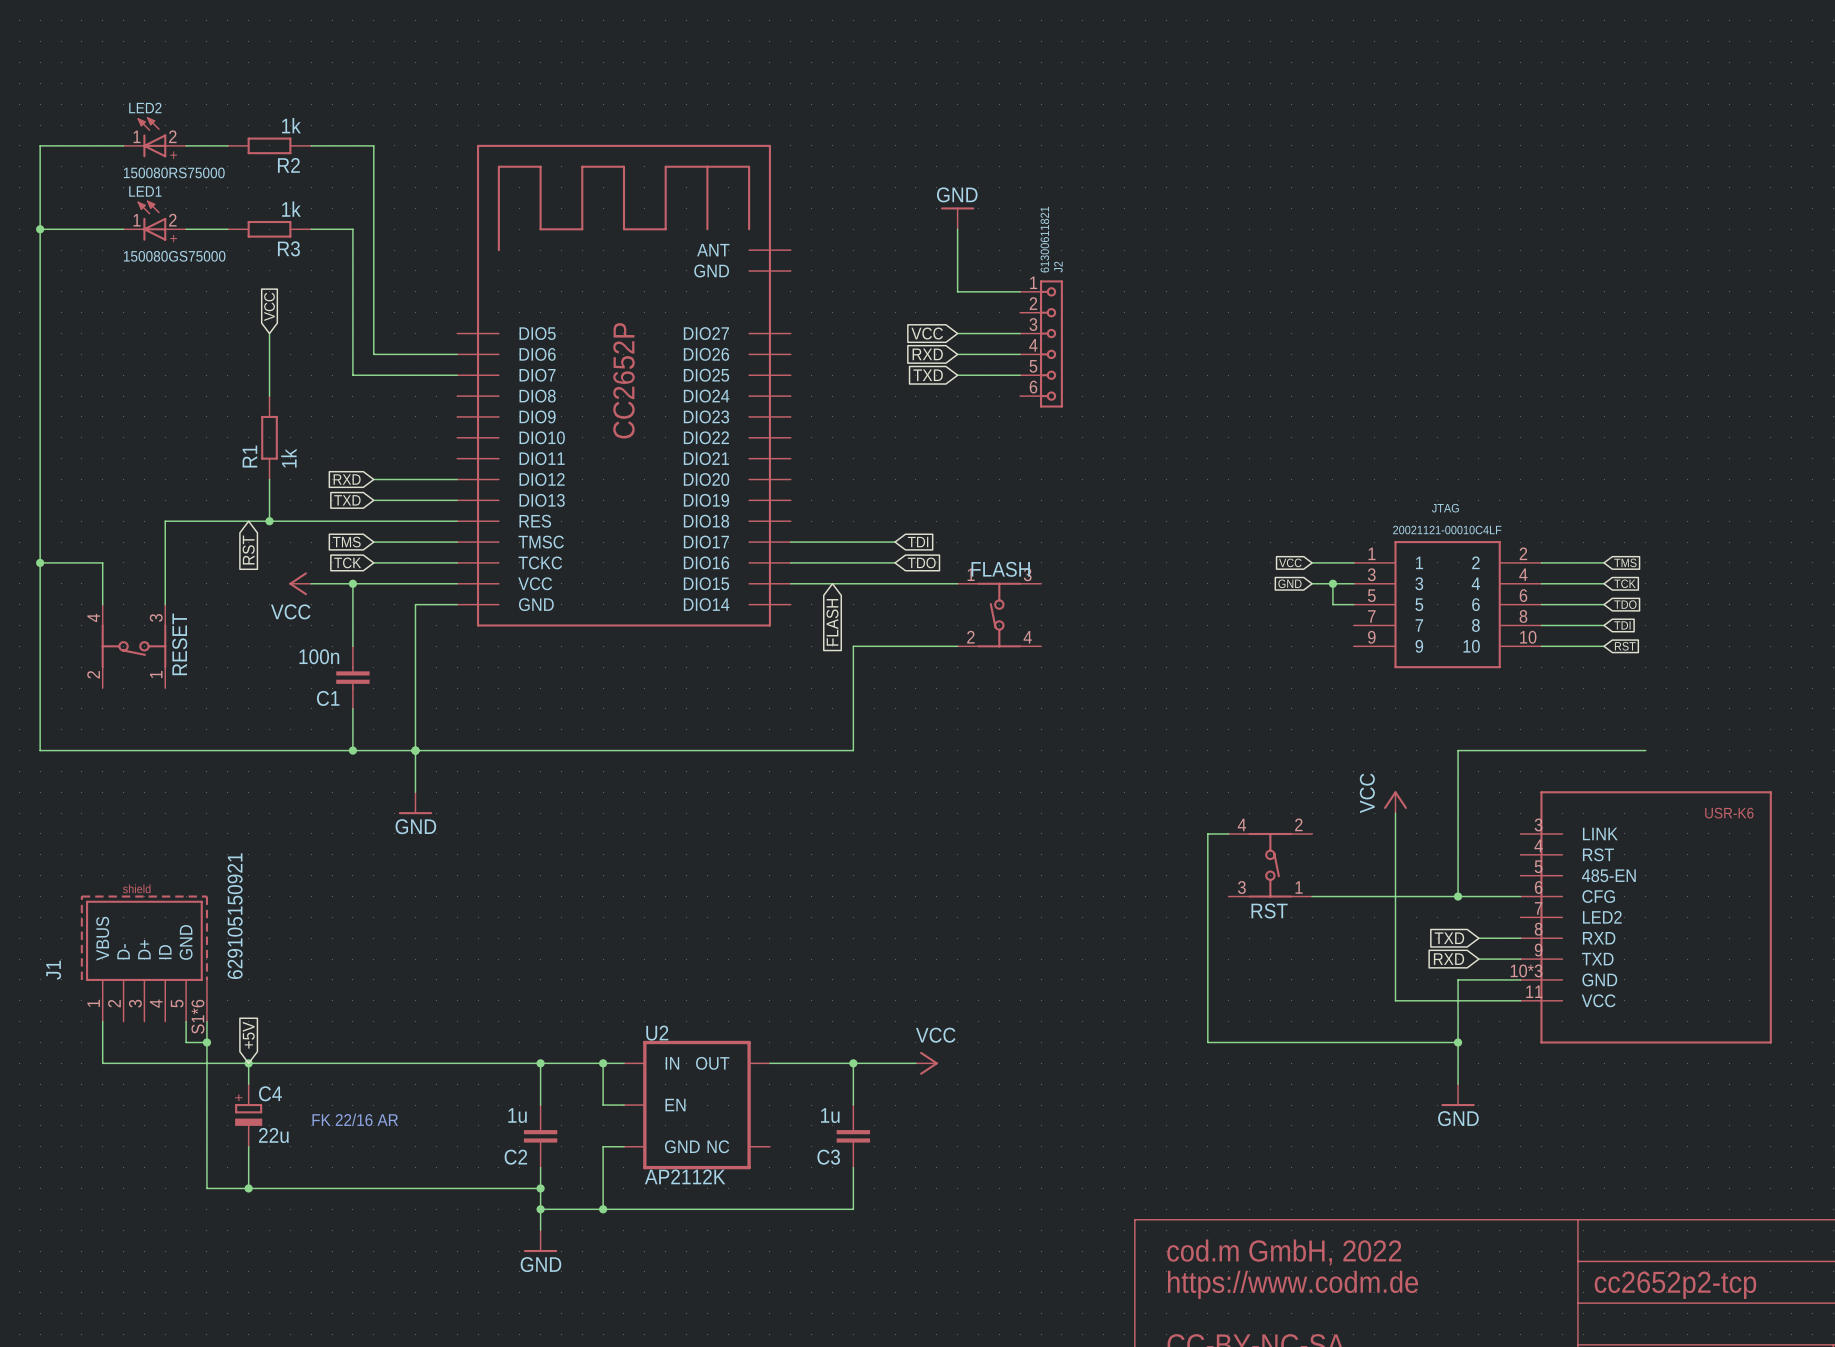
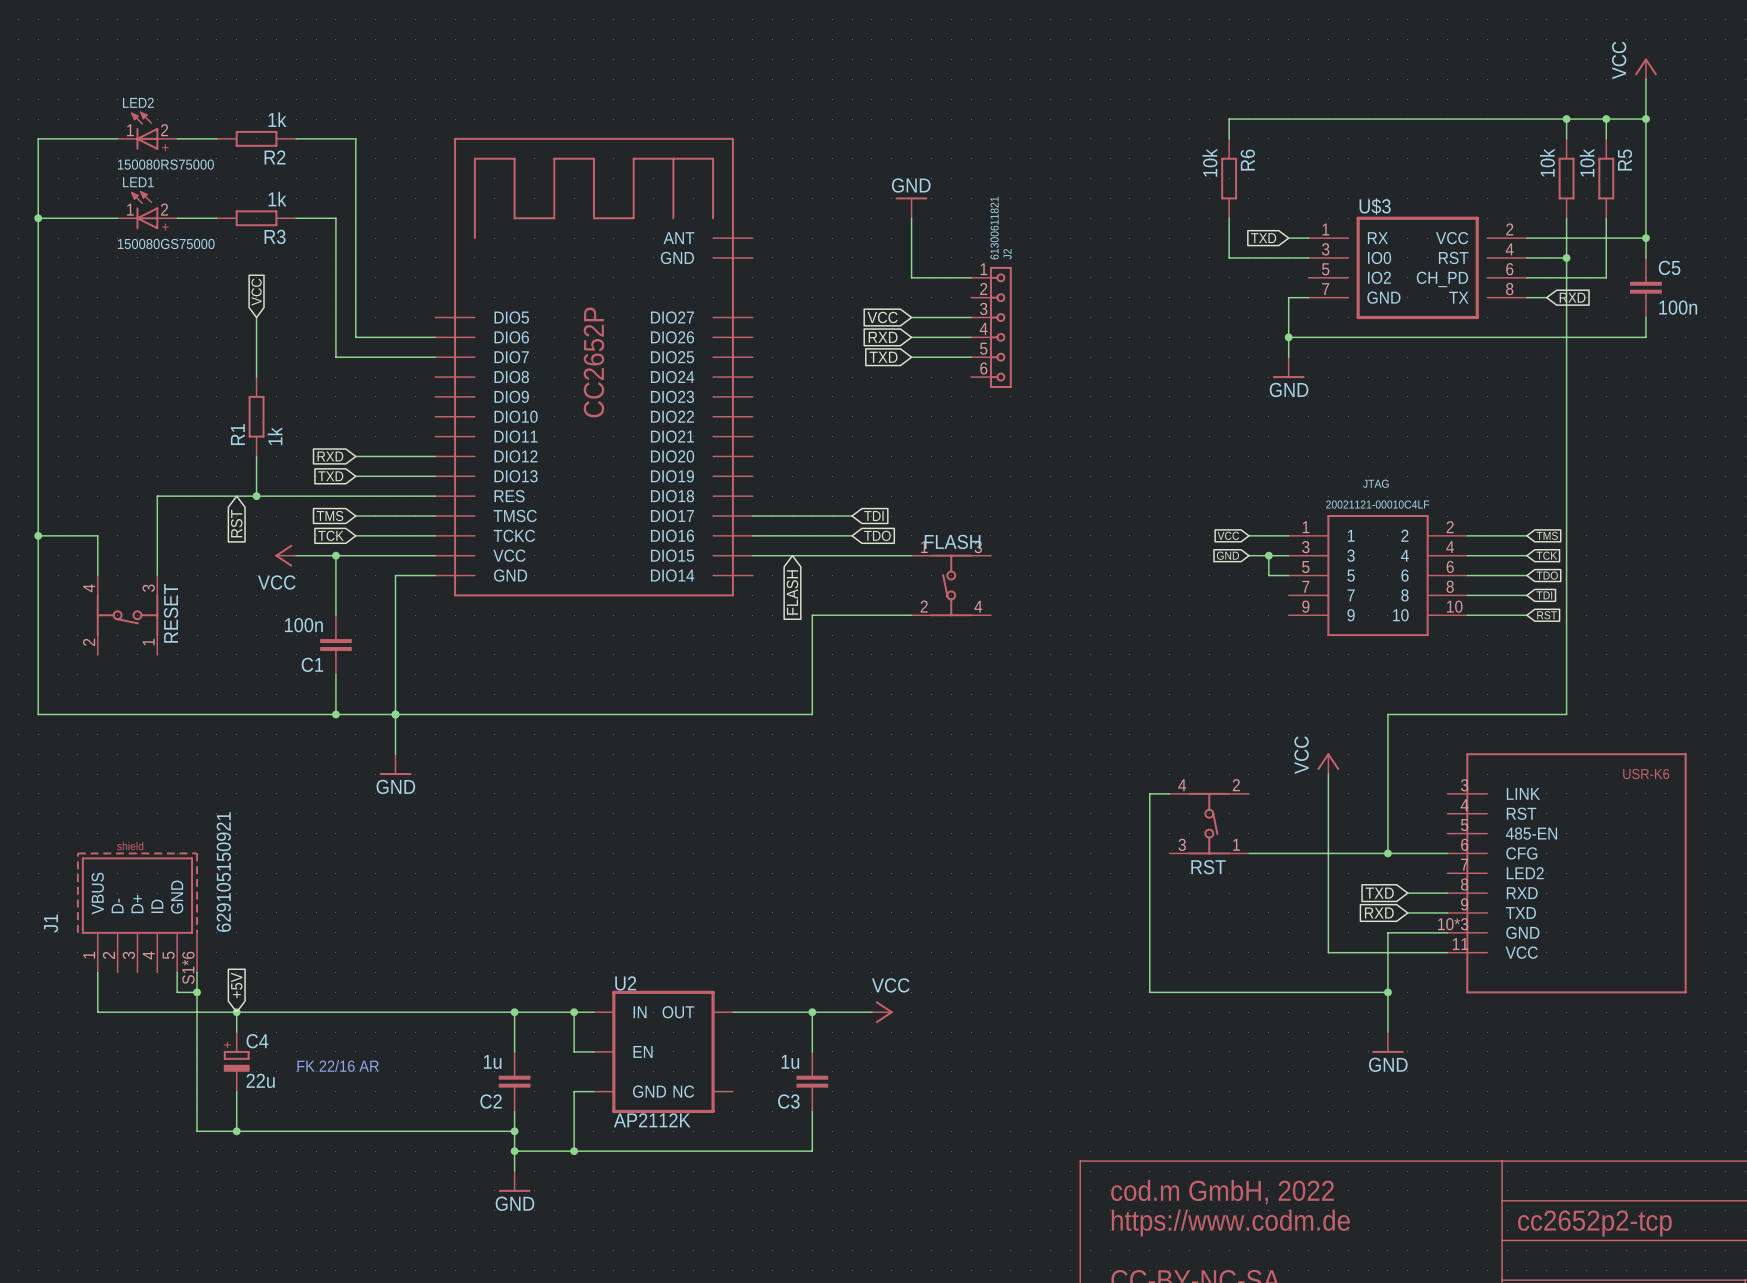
power symbol: none -> VCC (1645, 68)
wire: none -> (1645, 79) (1645, 257)
wire: none -> (1566, 119) (1566, 138)
junction: none -> (1566, 119)
wire: none -> (1606, 119) (1606, 138)
junction: none -> (1606, 119)
wire: none -> (1645, 119) (1229, 119) (1229, 138)
junction: none -> (1645, 119)
R6: none -> 10k (1229, 178)
part: none -> 10k (1566, 178)
R5: none -> 10k (1606, 178)
wire: none -> (1229, 218) (1229, 257) (1308, 257)
wire: none -> (1566, 218) (1566, 714)
wire: none -> (1606, 218) (1606, 277) (1526, 277)
global label: none -> TXD (1263, 238)
wire: none -> (1288, 238) (1308, 238)
wire: none -> (1526, 238) (1645, 238)
junction: none -> (1645, 238)
wire: none -> (1526, 257) (1566, 257)
junction: none -> (1566, 257)
U$3: none -> (1417, 267)
C5: none -> 100n (1645, 287)
wire: none -> (1308, 297) (1288, 297) (1288, 357)
wire: none -> (1526, 297) (1546, 297)
global label: none -> RXD (1572, 297)
wire: none -> (1645, 317) (1645, 337) (1288, 337)
junction: none -> (1288, 337)
power symbol: none -> GND (1288, 367)

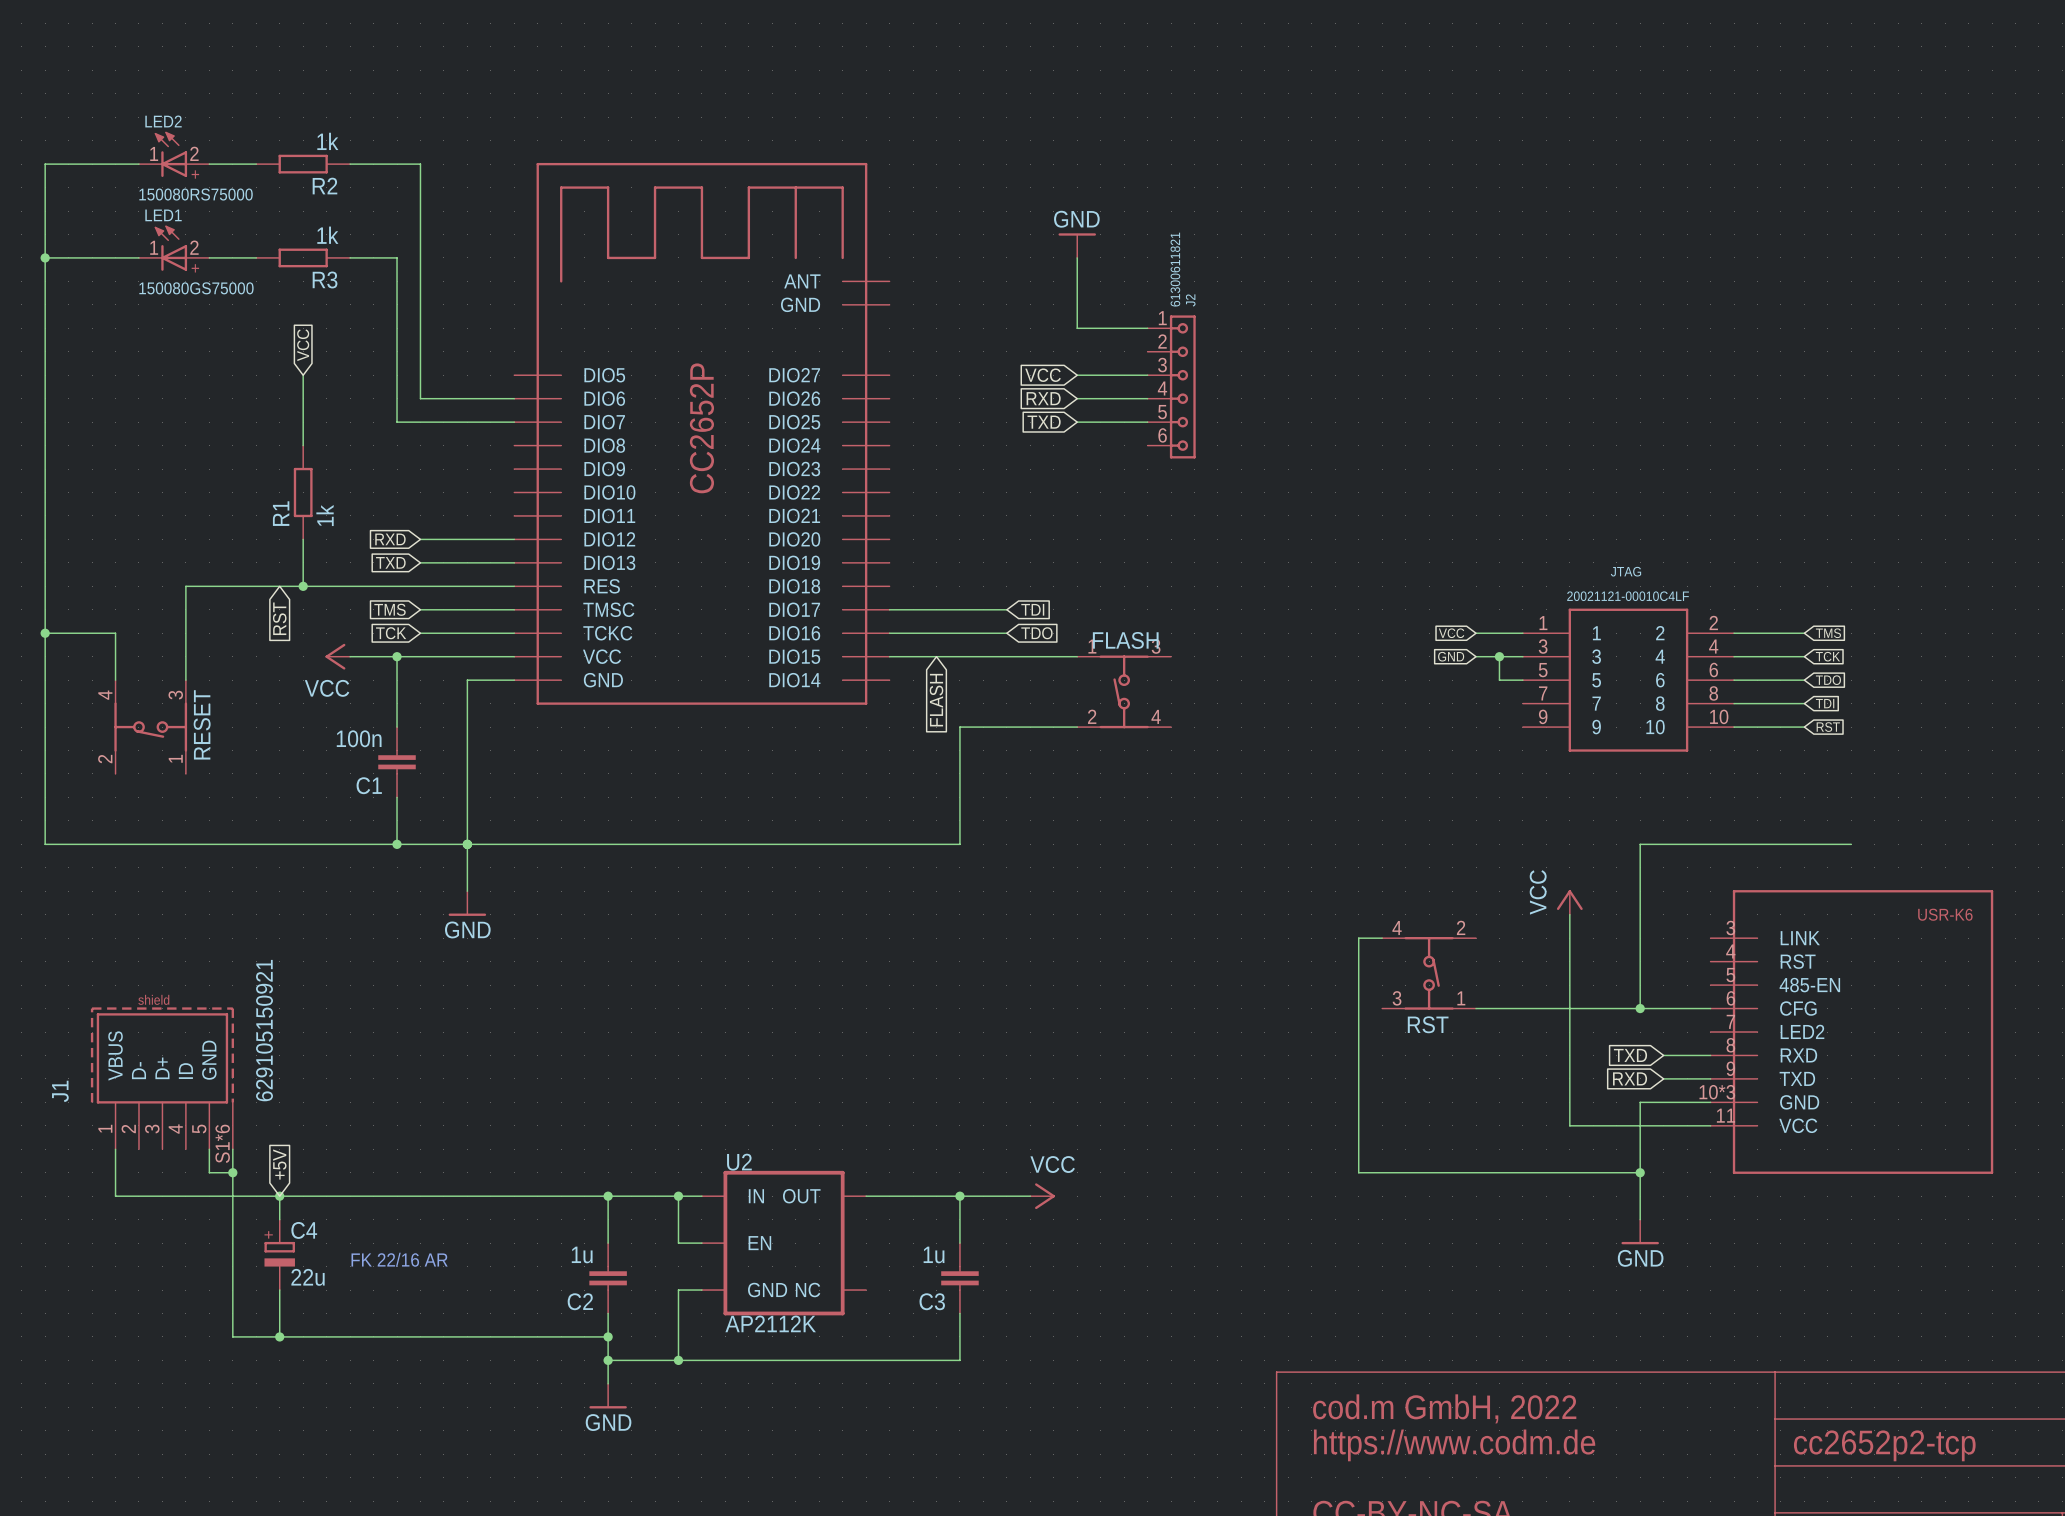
power symbol: VCC (1645, 68) -> none
wire: (1645, 79) (1645, 257) -> none
wire: (1566, 119) (1566, 138) -> none
junction: (1566, 119) -> none
wire: (1606, 119) (1606, 138) -> none
junction: (1606, 119) -> none
wire: (1645, 119) (1229, 119) (1229, 138) -> none
junction: (1645, 119) -> none
R6: 10k (1229, 178) -> none
part: 10k (1566, 178) -> none
R5: 10k (1606, 178) -> none
wire: (1229, 218) (1229, 257) (1308, 257) -> none
wire: (1566, 218) (1566, 714) -> none
wire: (1606, 218) (1606, 277) (1526, 277) -> none
global label: TXD (1263, 238) -> none
wire: (1288, 238) (1308, 238) -> none
wire: (1526, 238) (1645, 238) -> none
junction: (1645, 238) -> none
wire: (1526, 257) (1566, 257) -> none
junction: (1566, 257) -> none
U$3: (1417, 267) -> none
C5: 100n (1645, 287) -> none
wire: (1308, 297) (1288, 297) (1288, 357) -> none
wire: (1526, 297) (1546, 297) -> none
global label: RXD (1572, 297) -> none
wire: (1645, 317) (1645, 337) (1288, 337) -> none
junction: (1288, 337) -> none
power symbol: GND (1288, 367) -> none

